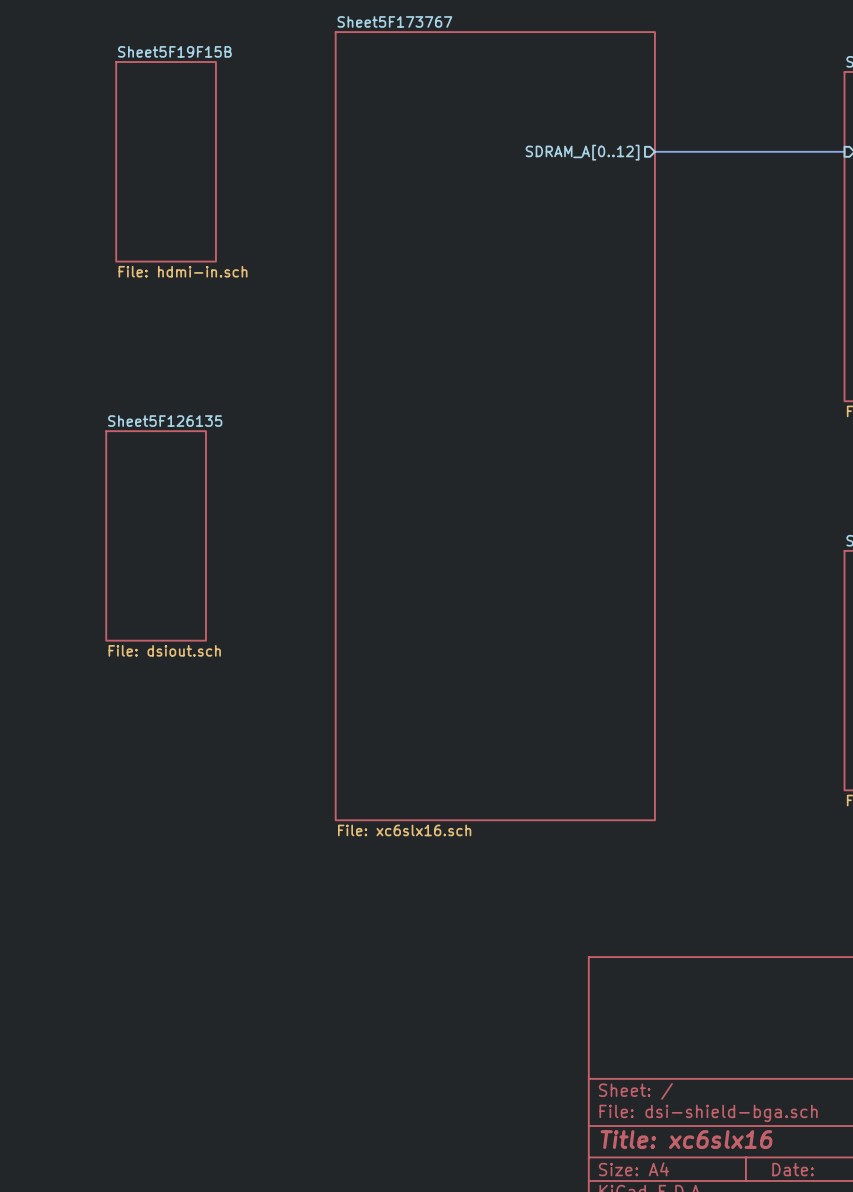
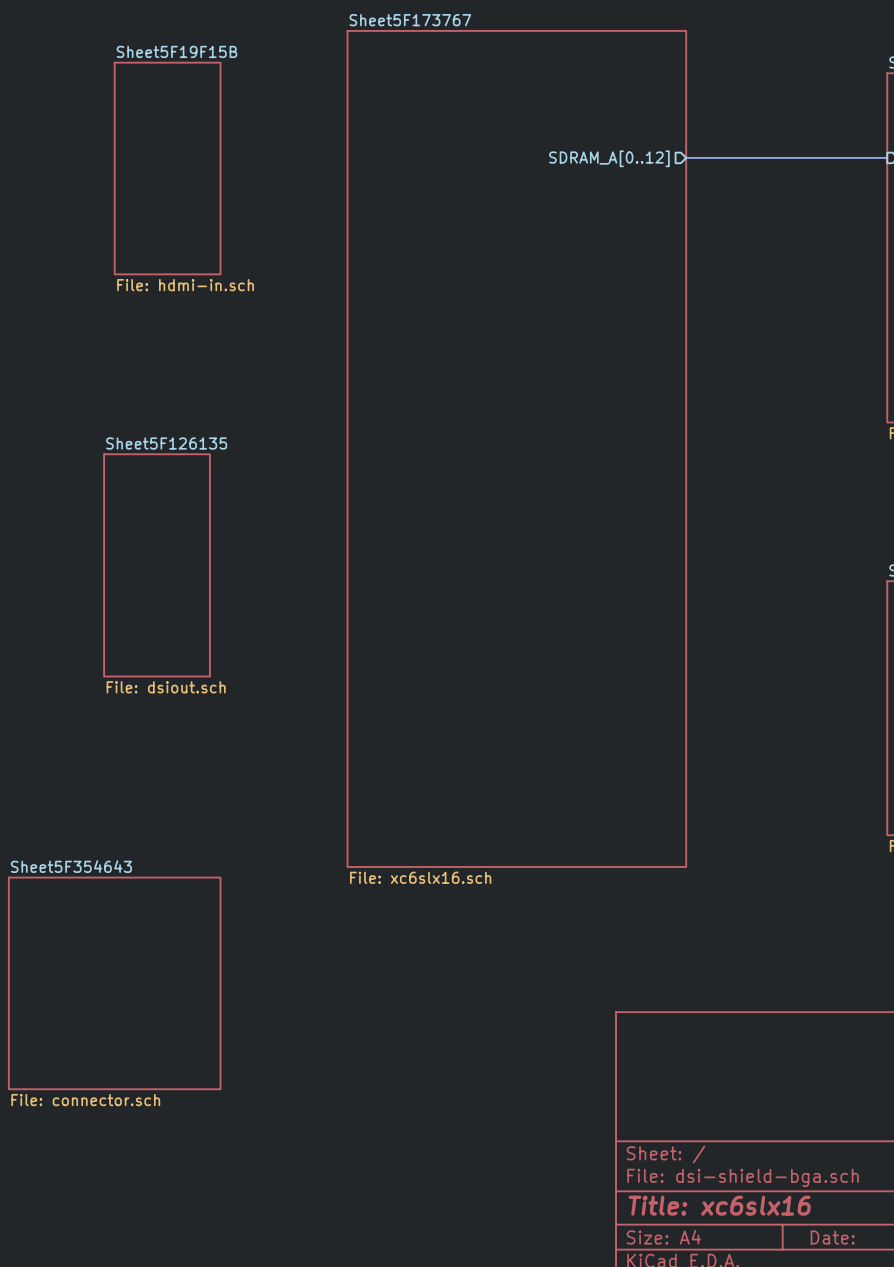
sheet Sheet5F354643: none -> File: connector.sch (114, 983)

